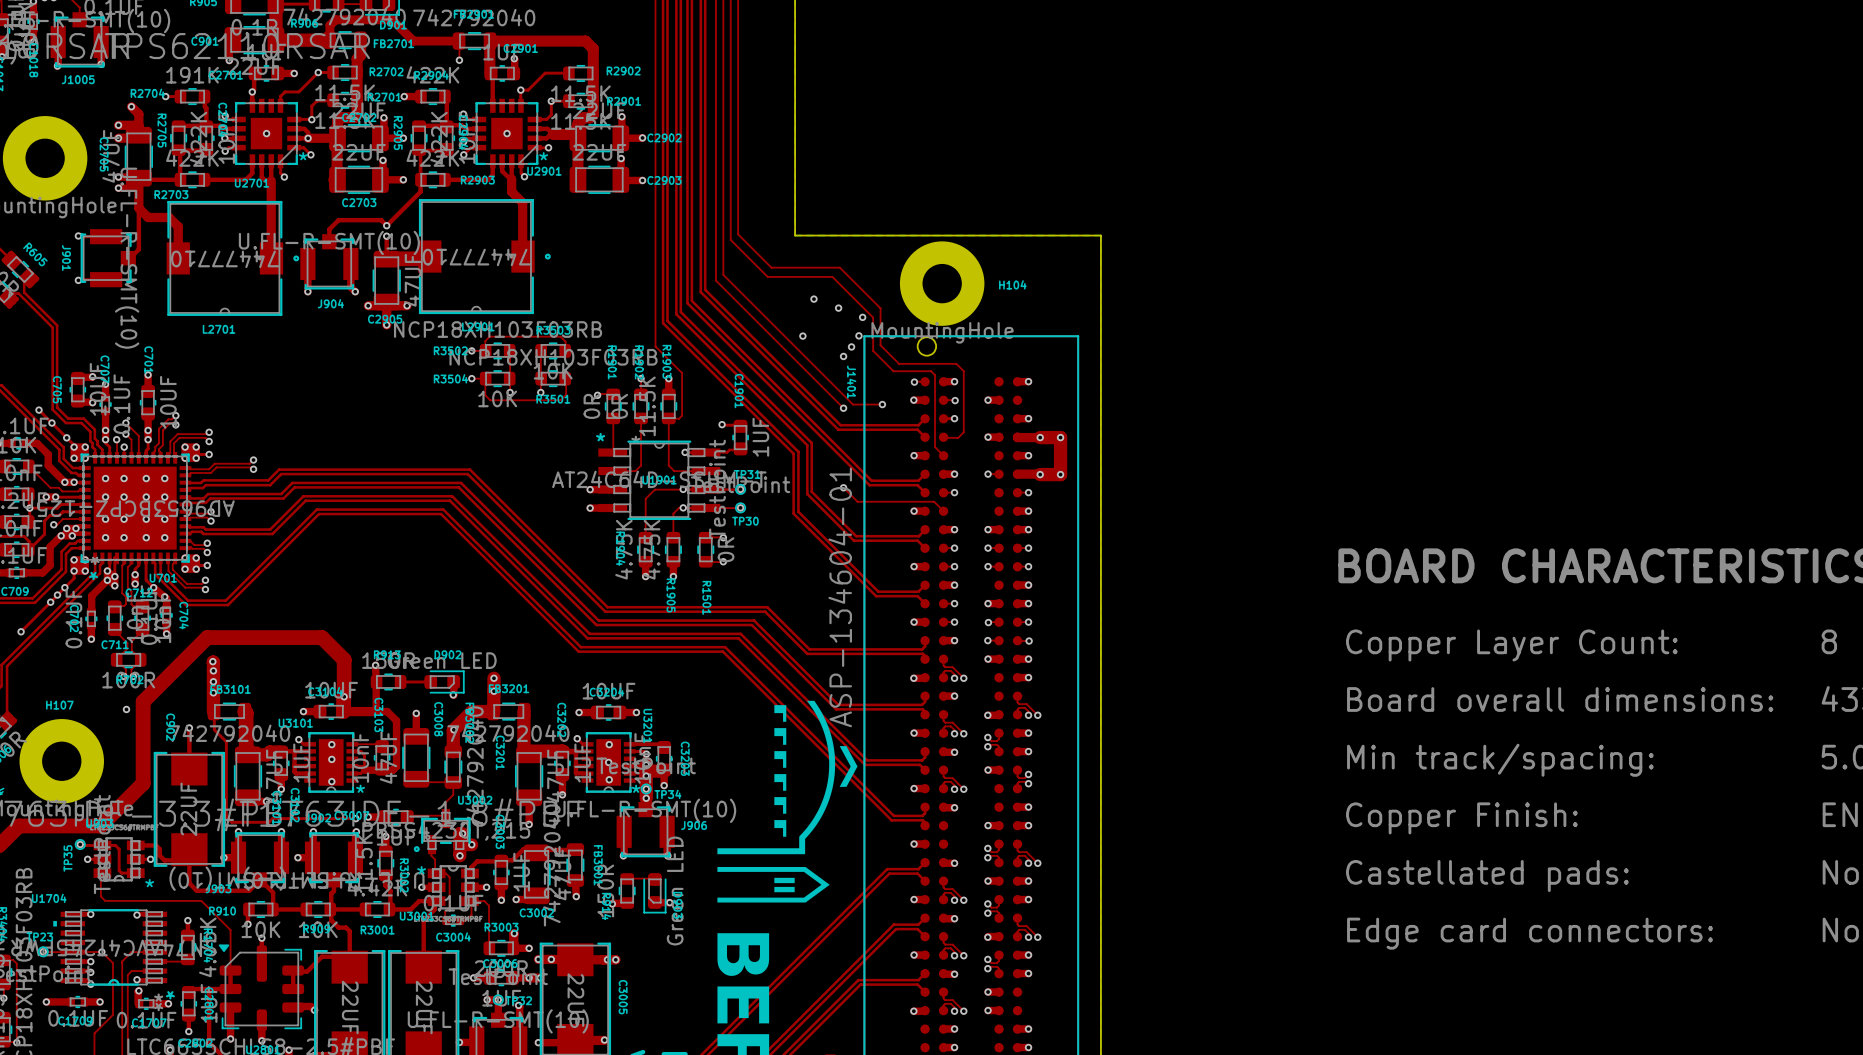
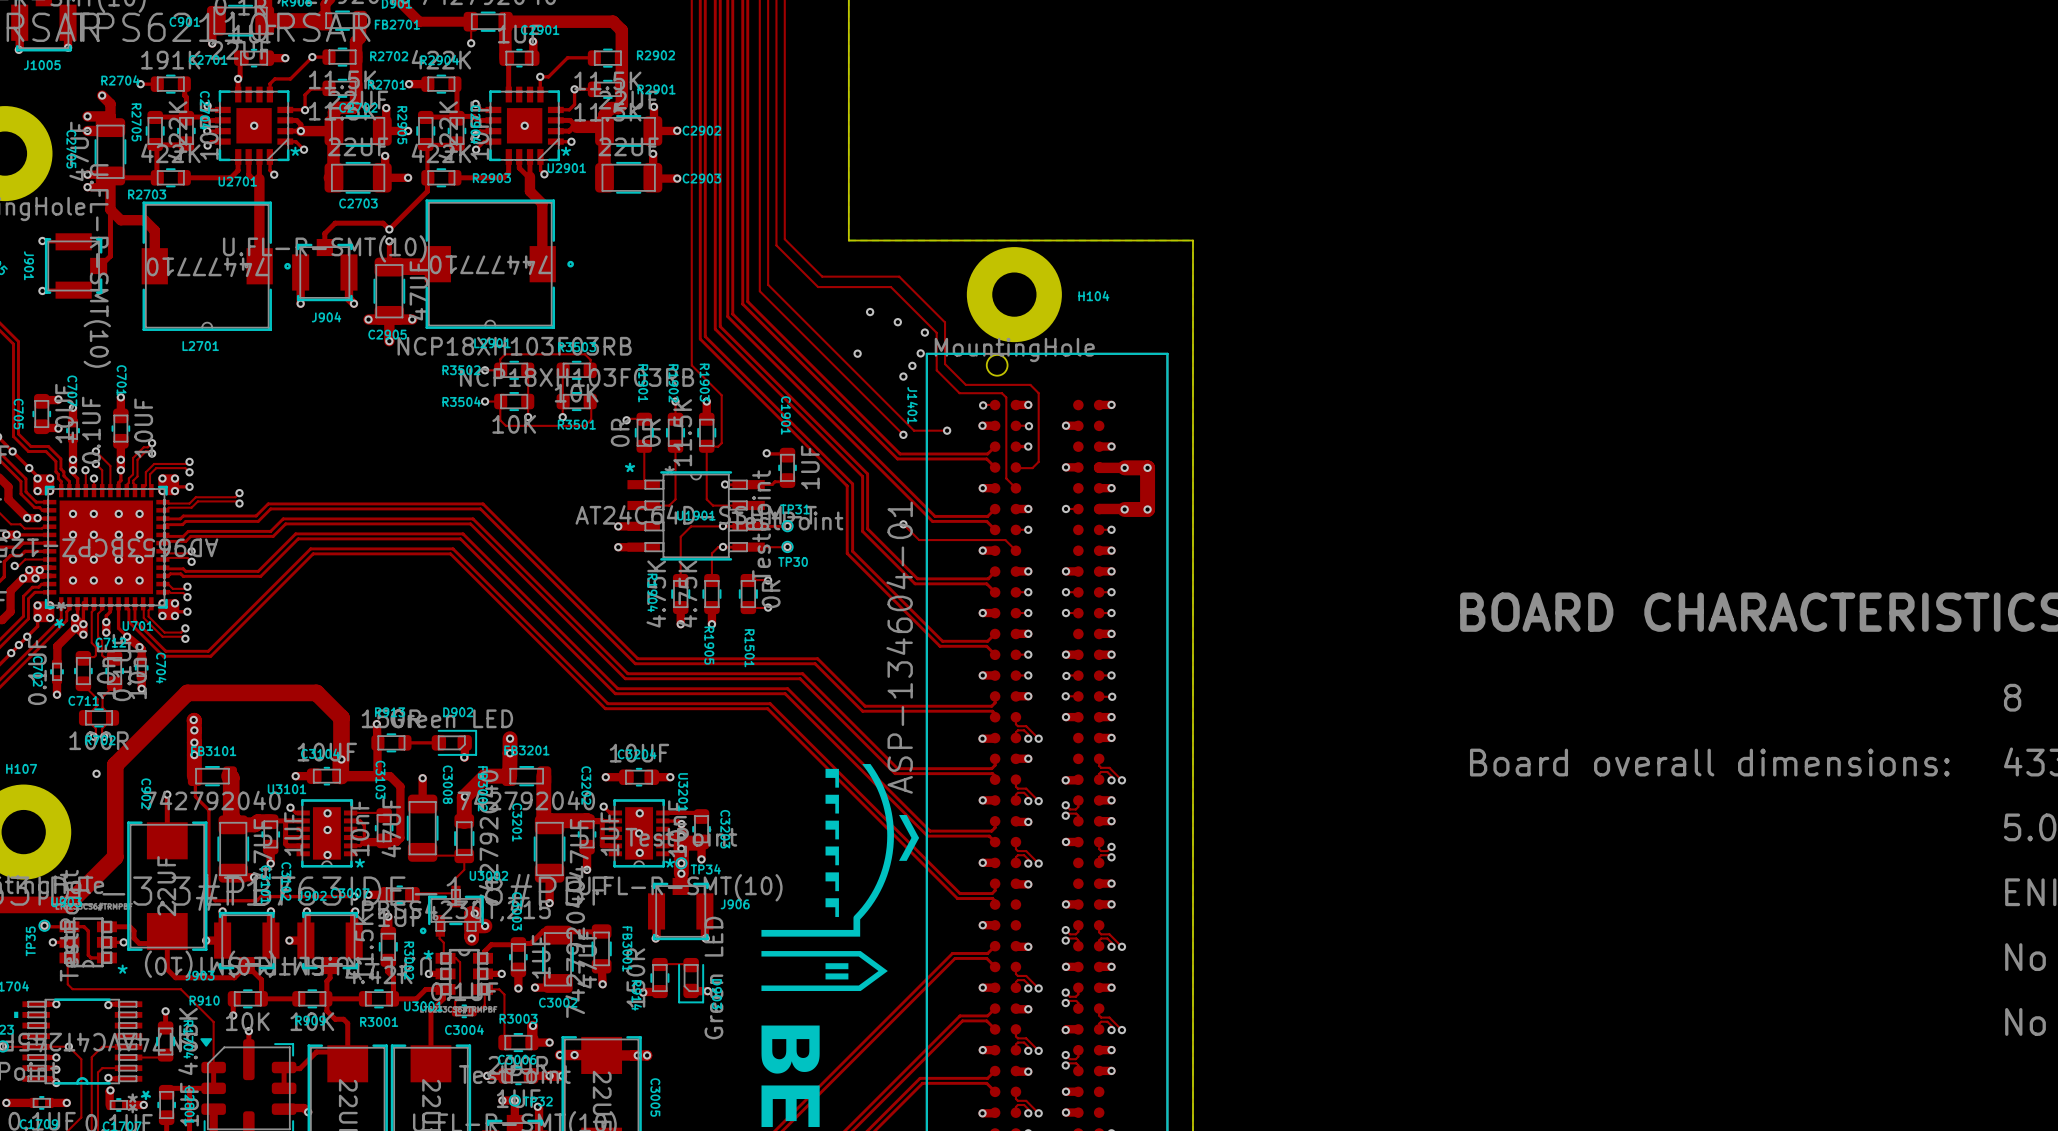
text: Copper Layer Count: (1511, 645) -> none
text: Min track/spacing: (1500, 760) -> none
text: Copper Finish: (1461, 818) -> none
text: Castellated pads: (1487, 876) -> none
text: Edge card connectors: (1530, 933) -> none

